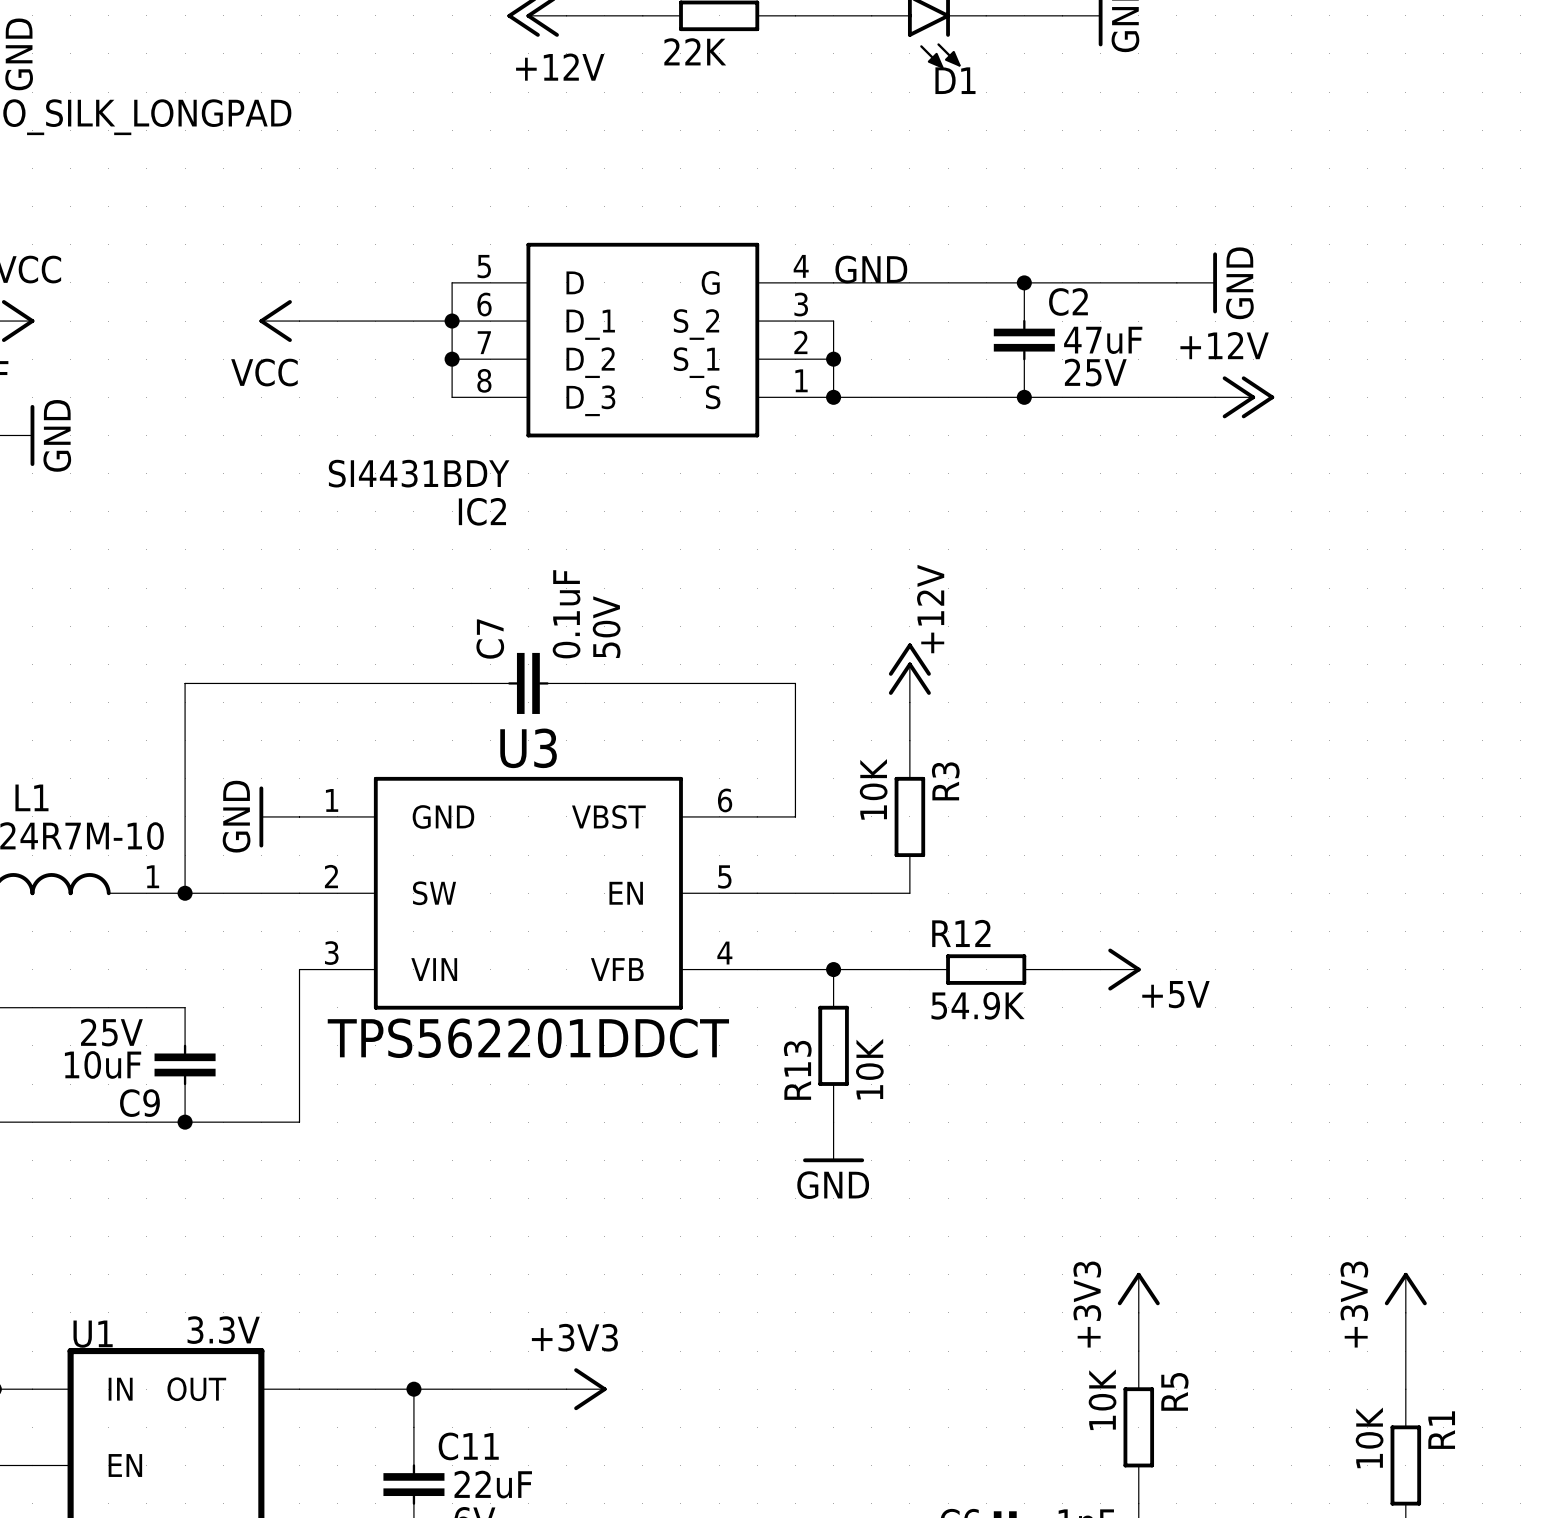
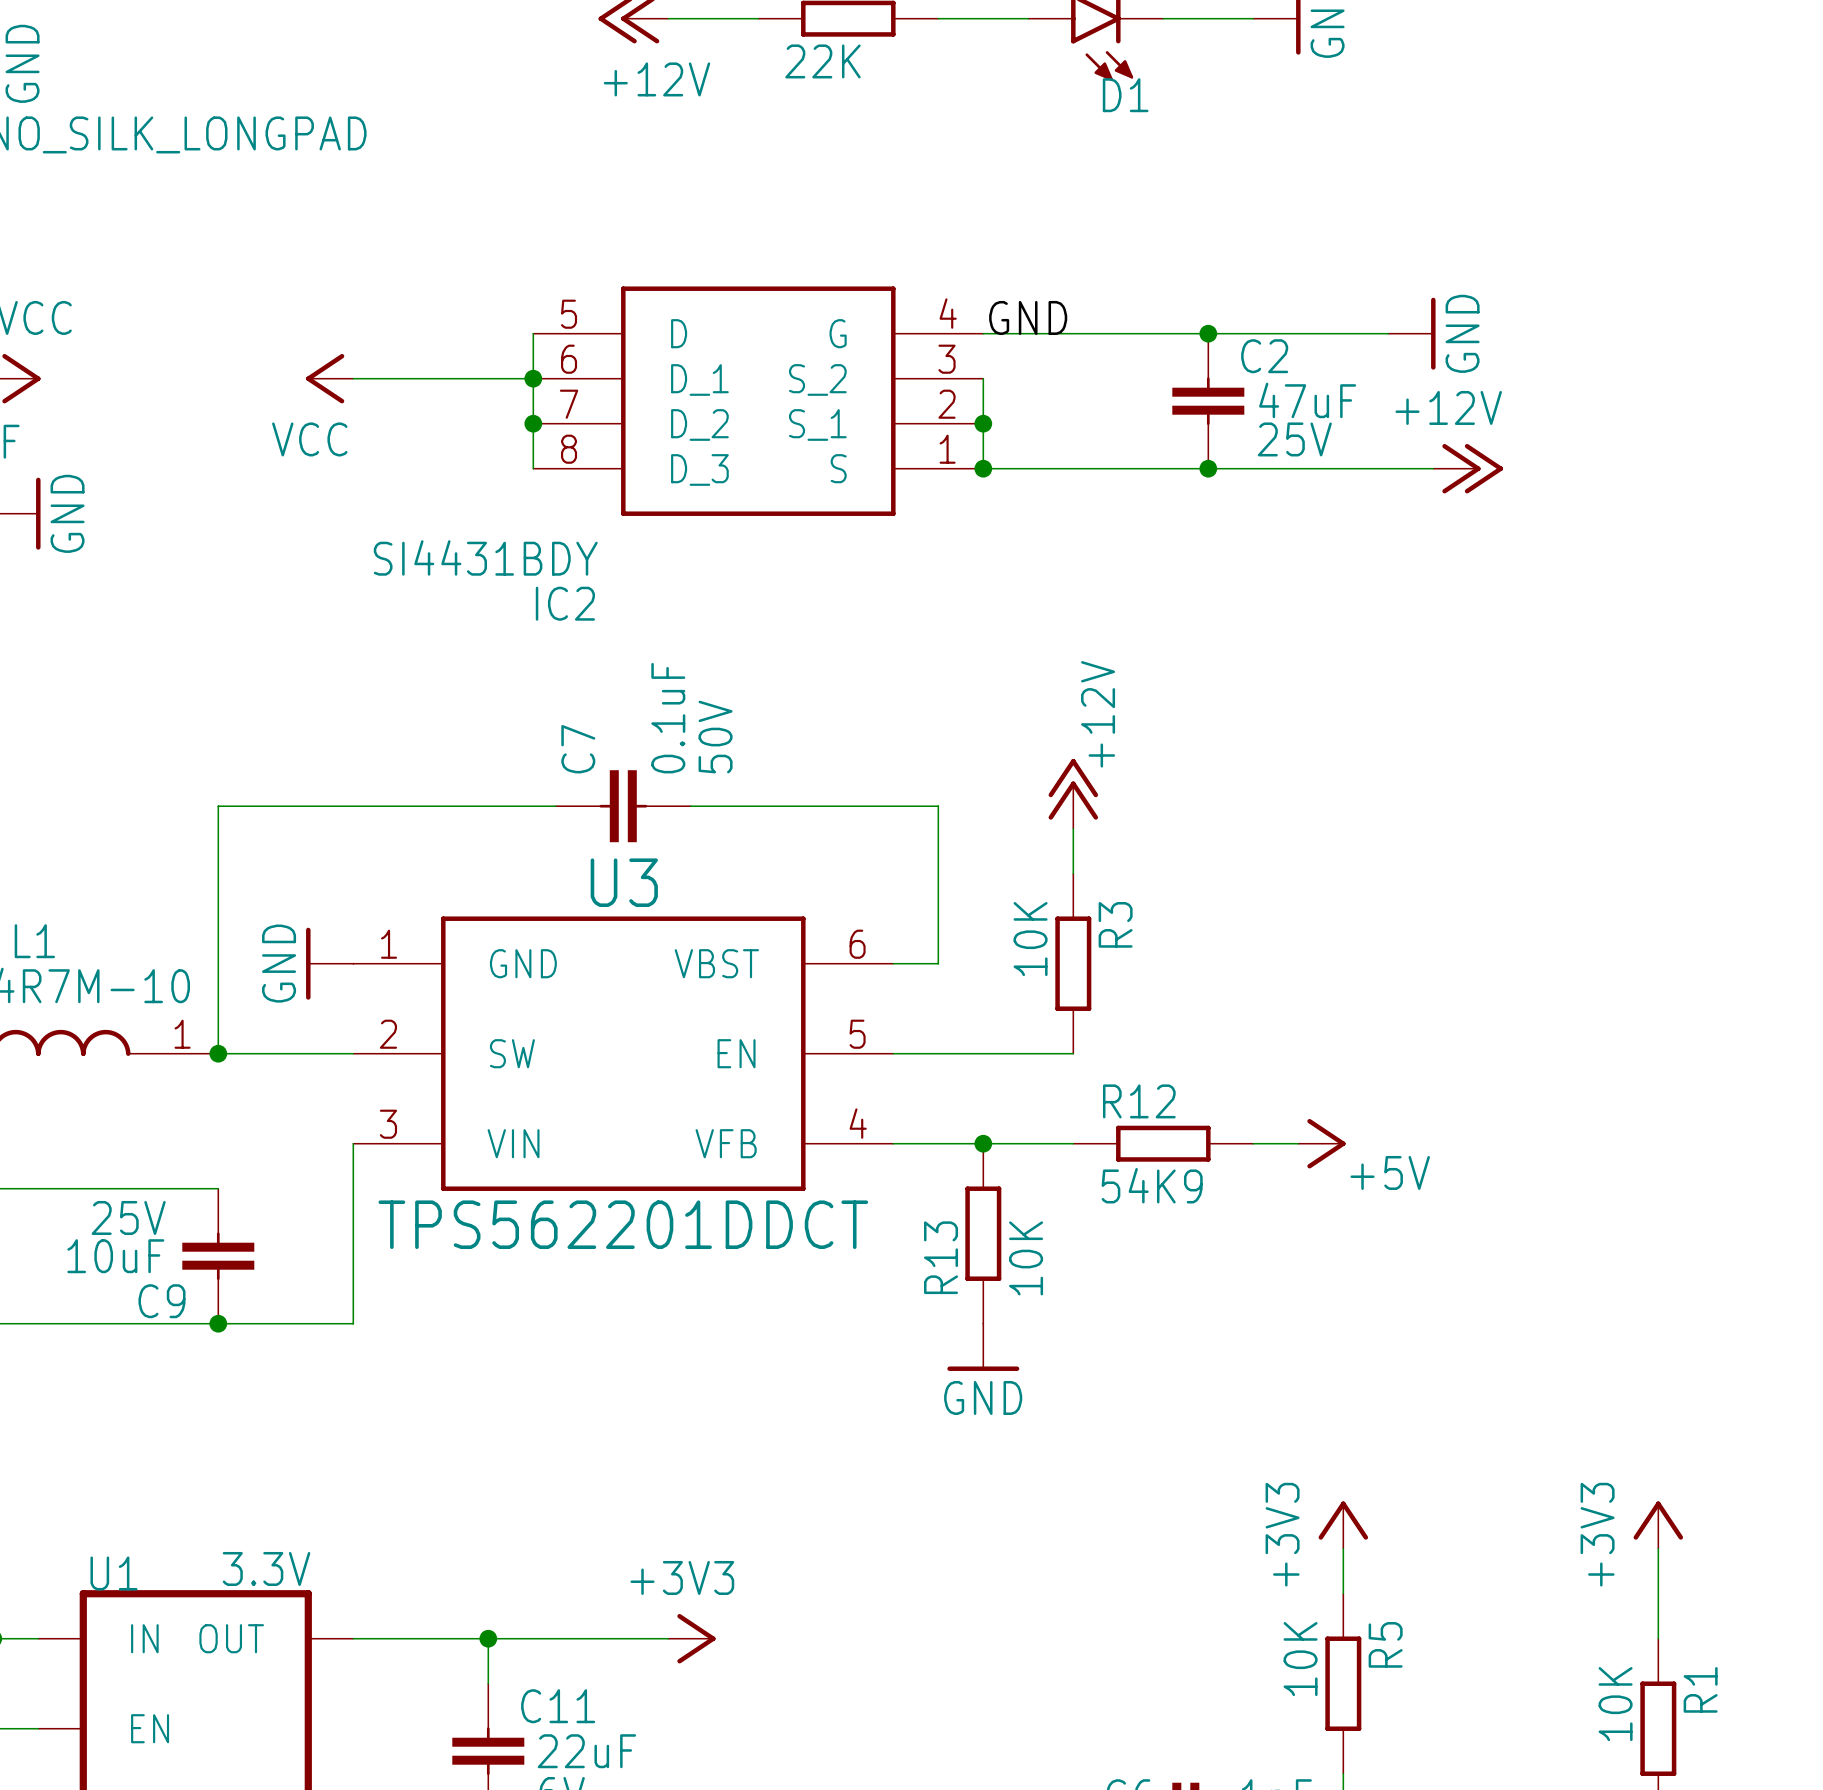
R12 value: 54.9K (978, 1005) -> 54K9 (1152, 1185)

